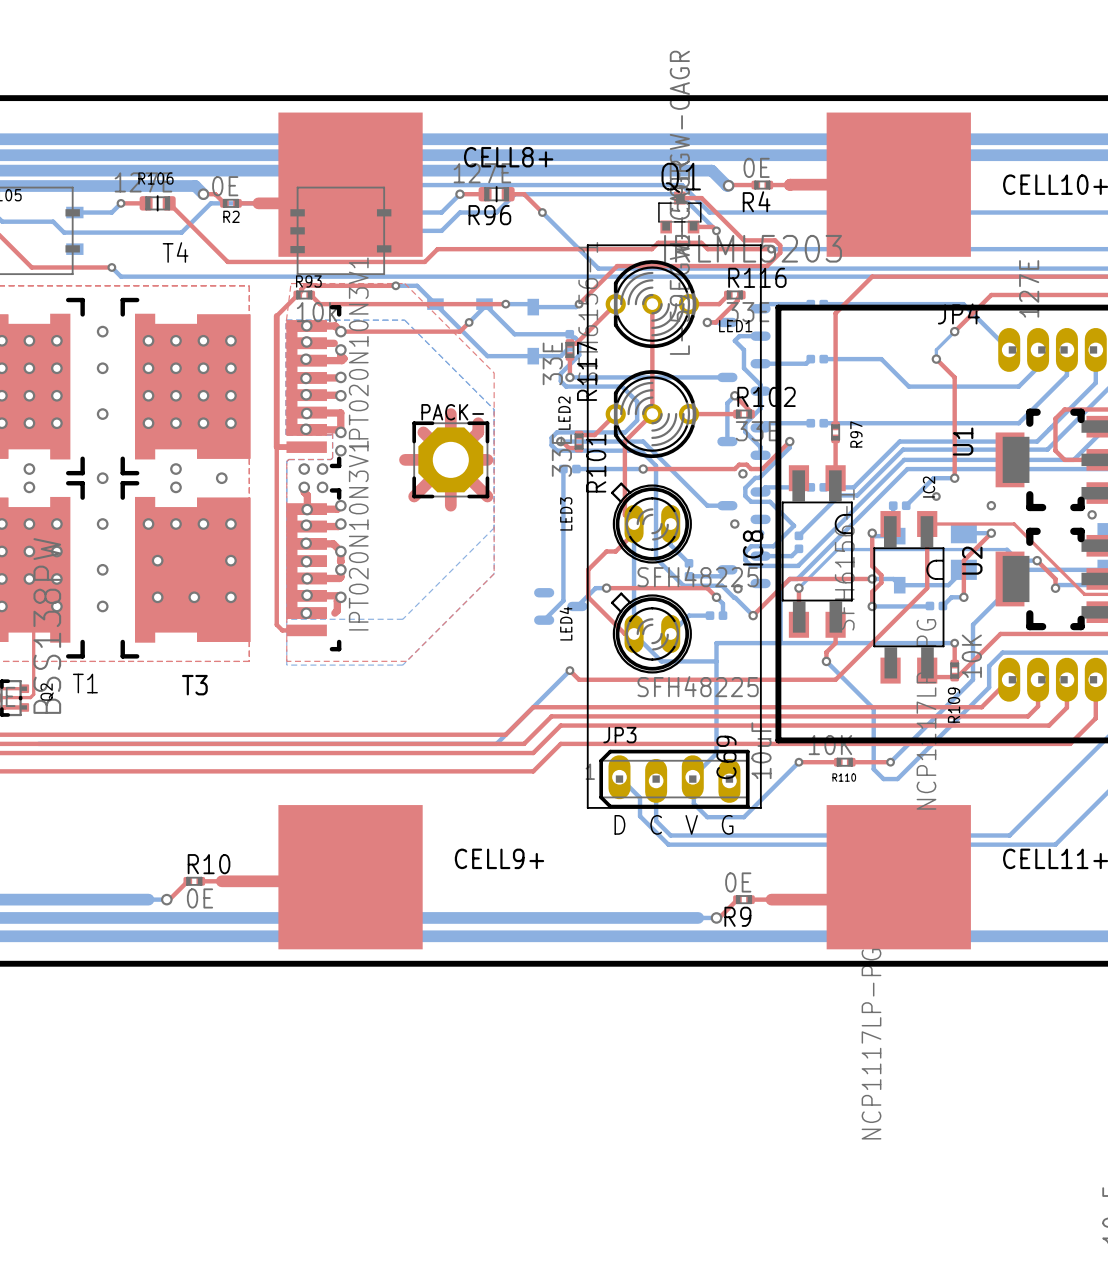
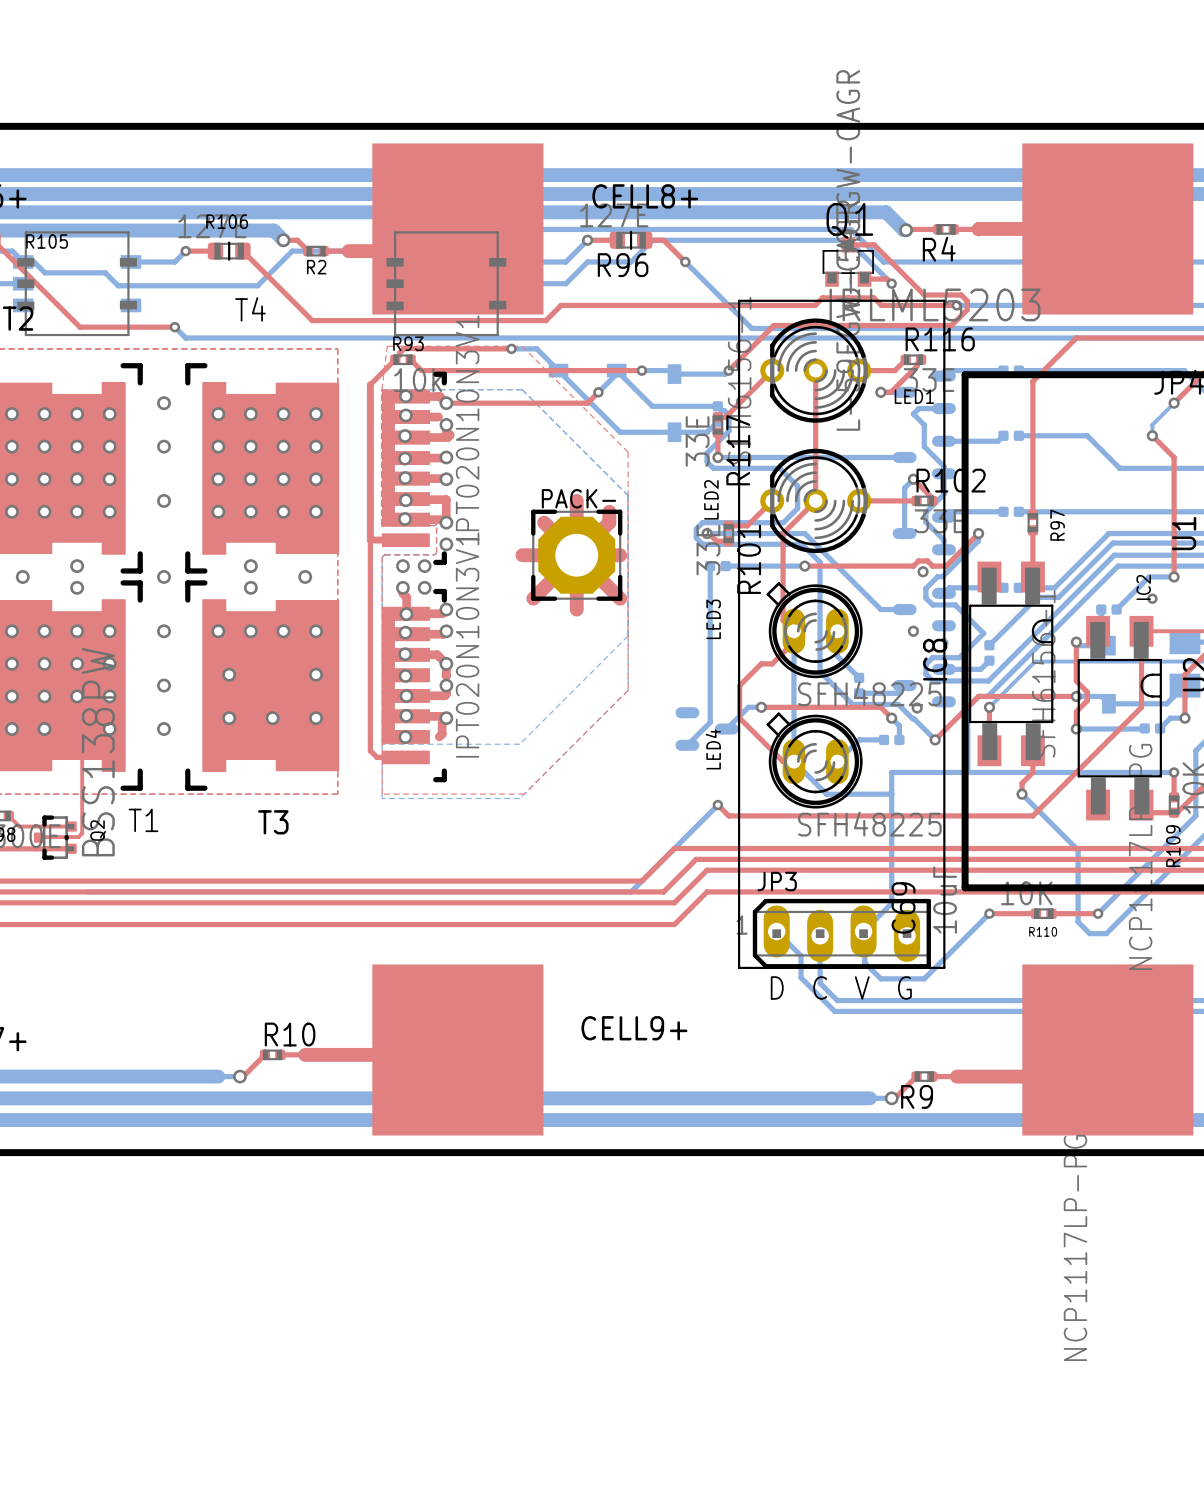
R4 value: 0E (756, 167) -> none
R2 value: 0E (225, 186) -> none
R9 value: 0E (738, 882) -> none
R10 value: 0E (200, 898) -> none

